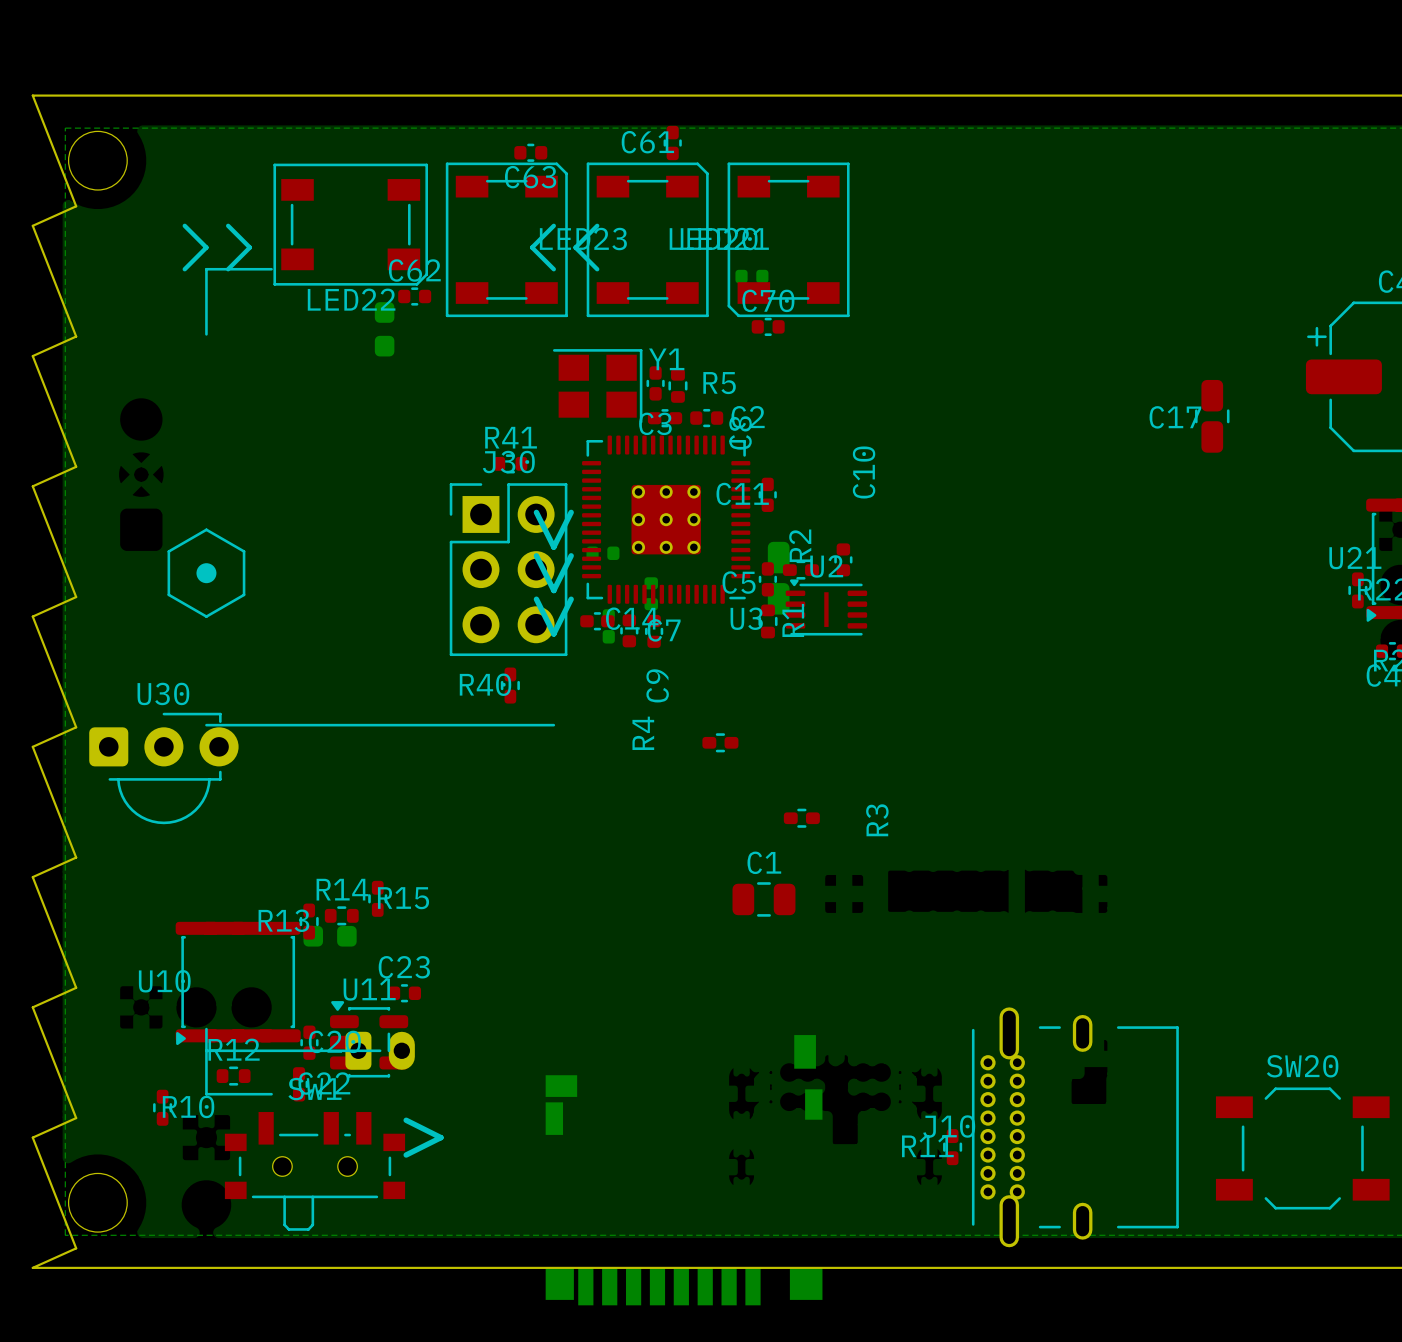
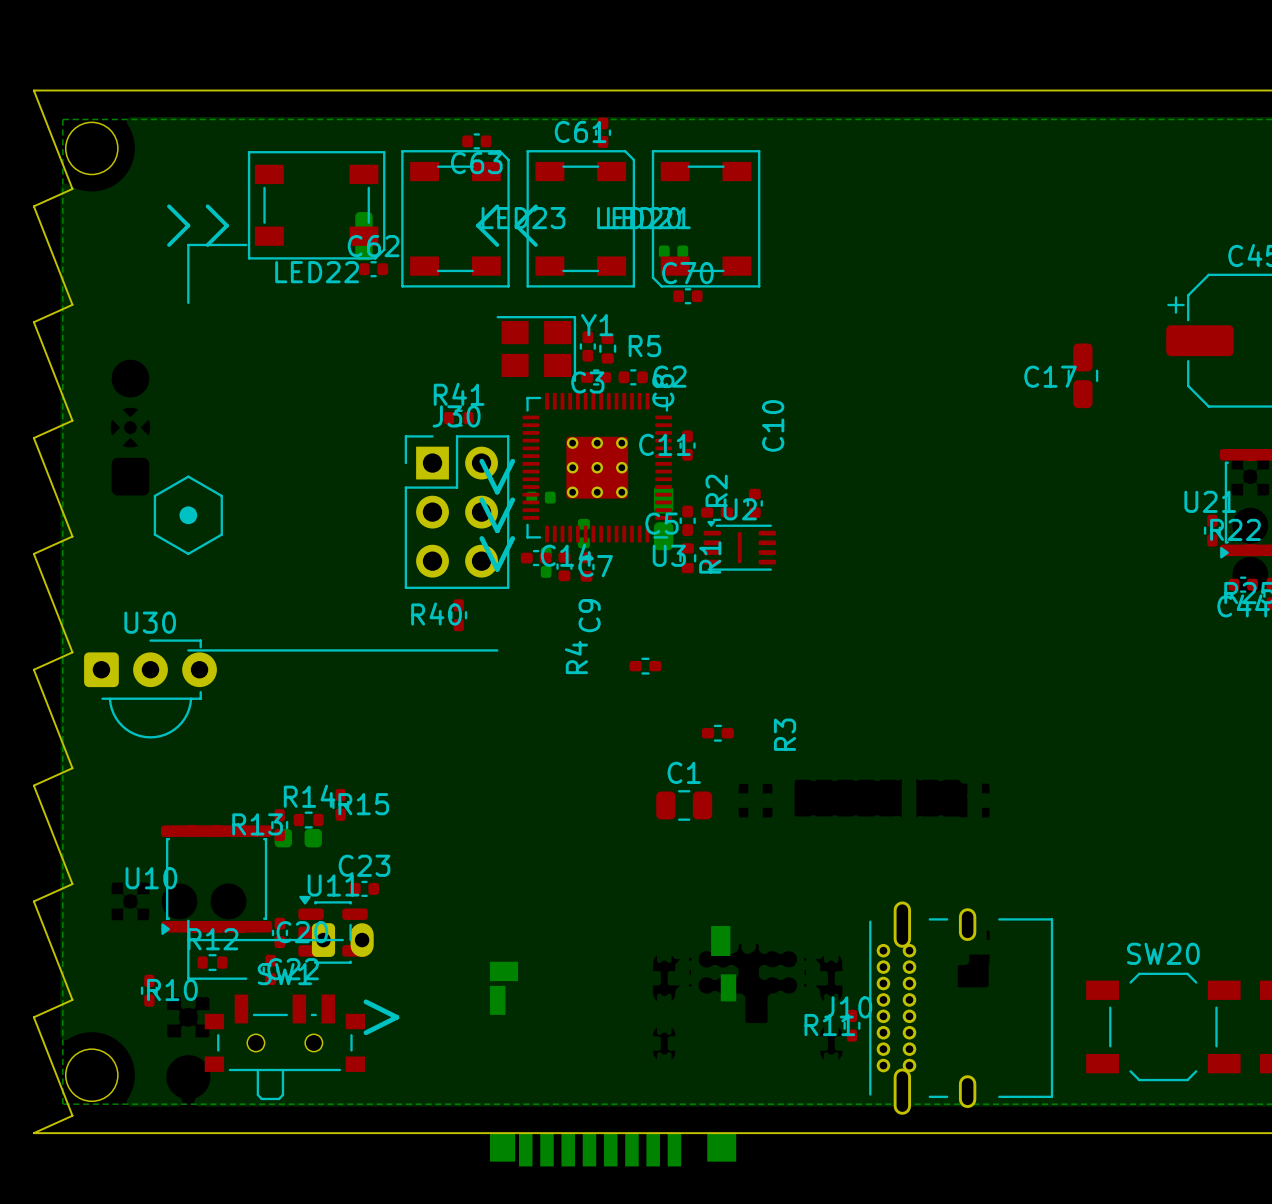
part position: (384, 329) -> (363, 236)
part position: (778, 578) -> (663, 517)

